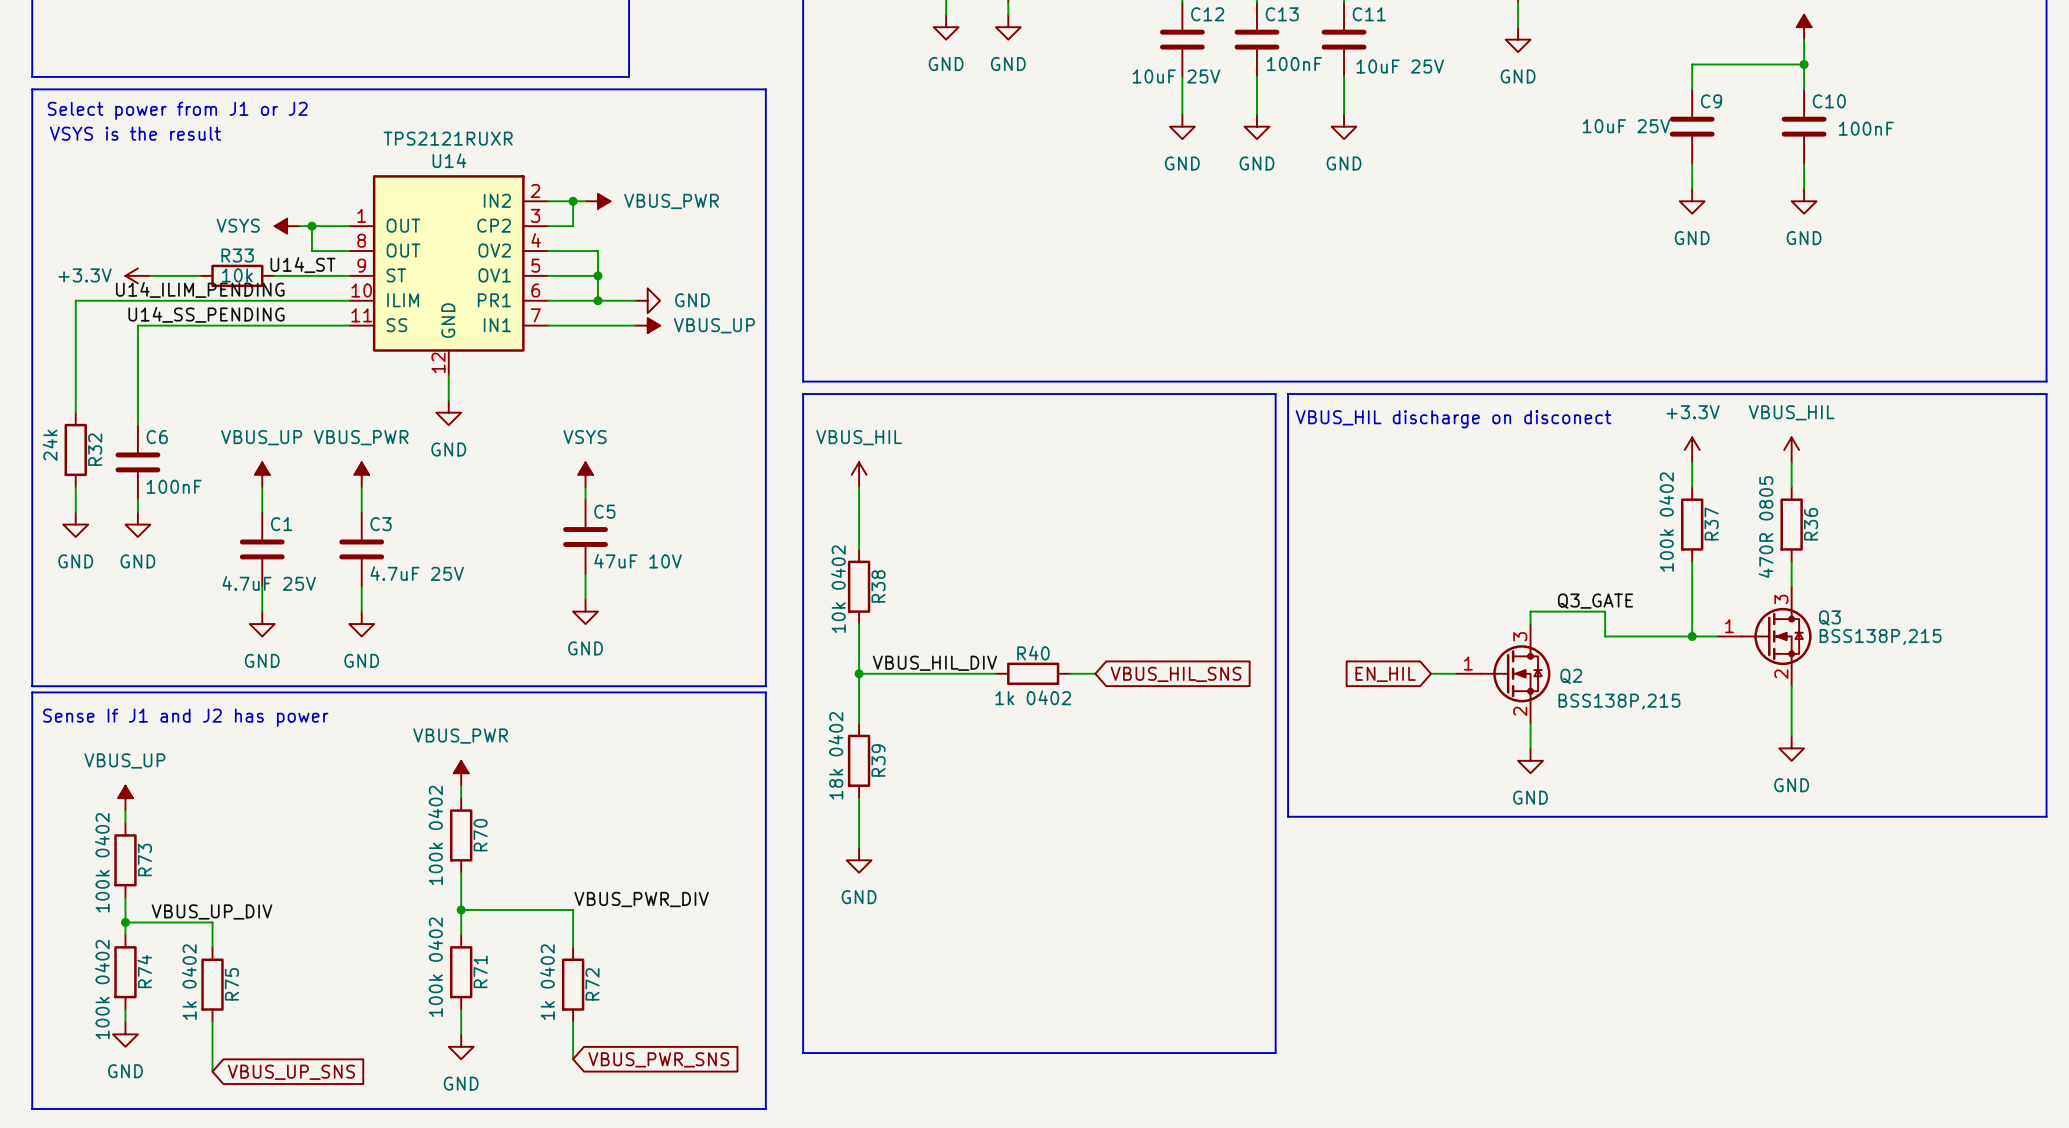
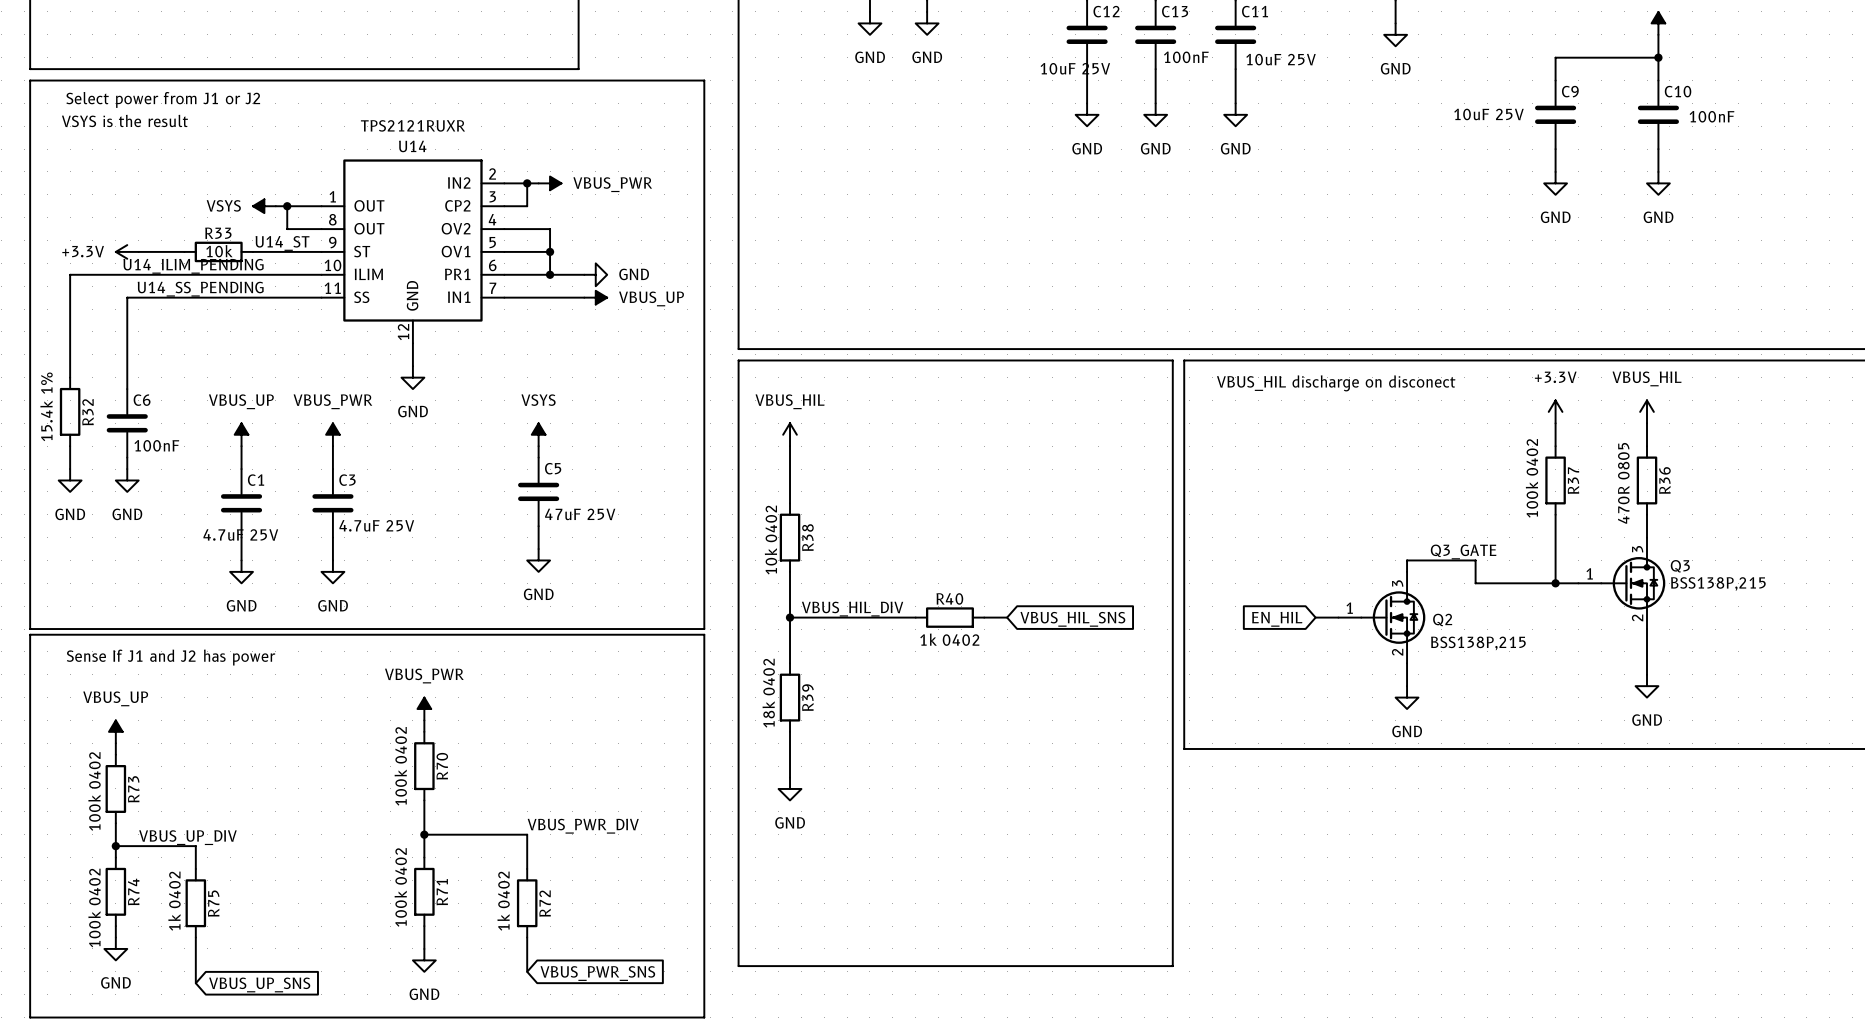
R32 value: 24k (50, 445) -> 15.4k 1% (46, 406)
C5 value: 47uF 10V (638, 561) -> 47uF 25V (580, 514)

